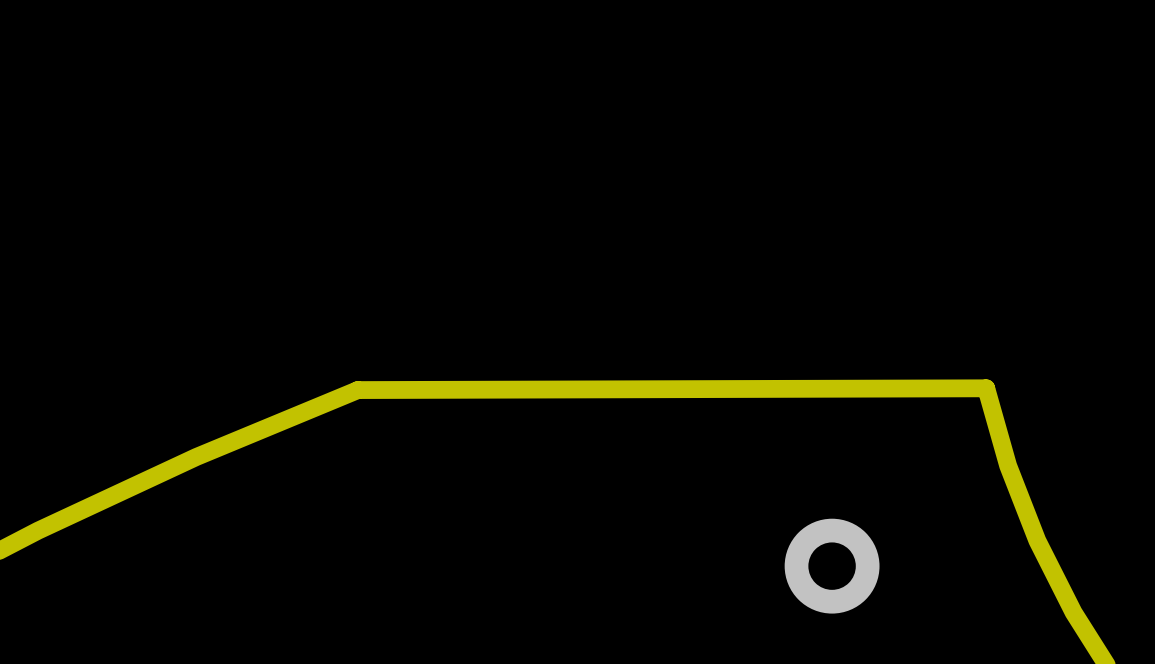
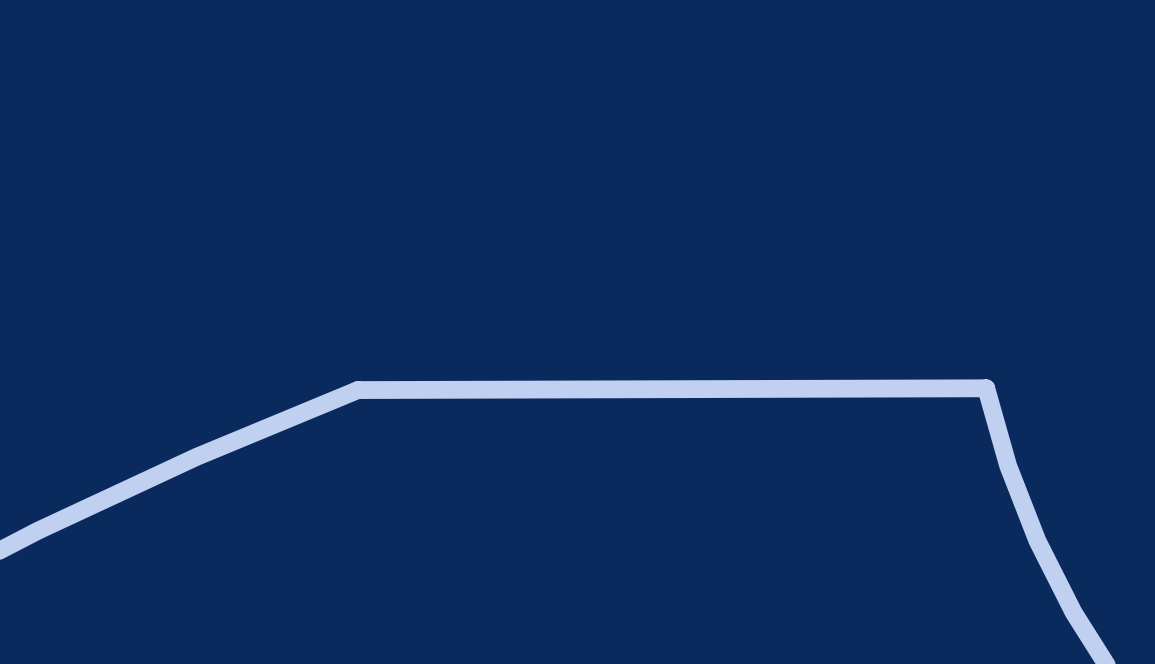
via: (832, 566) -> none

